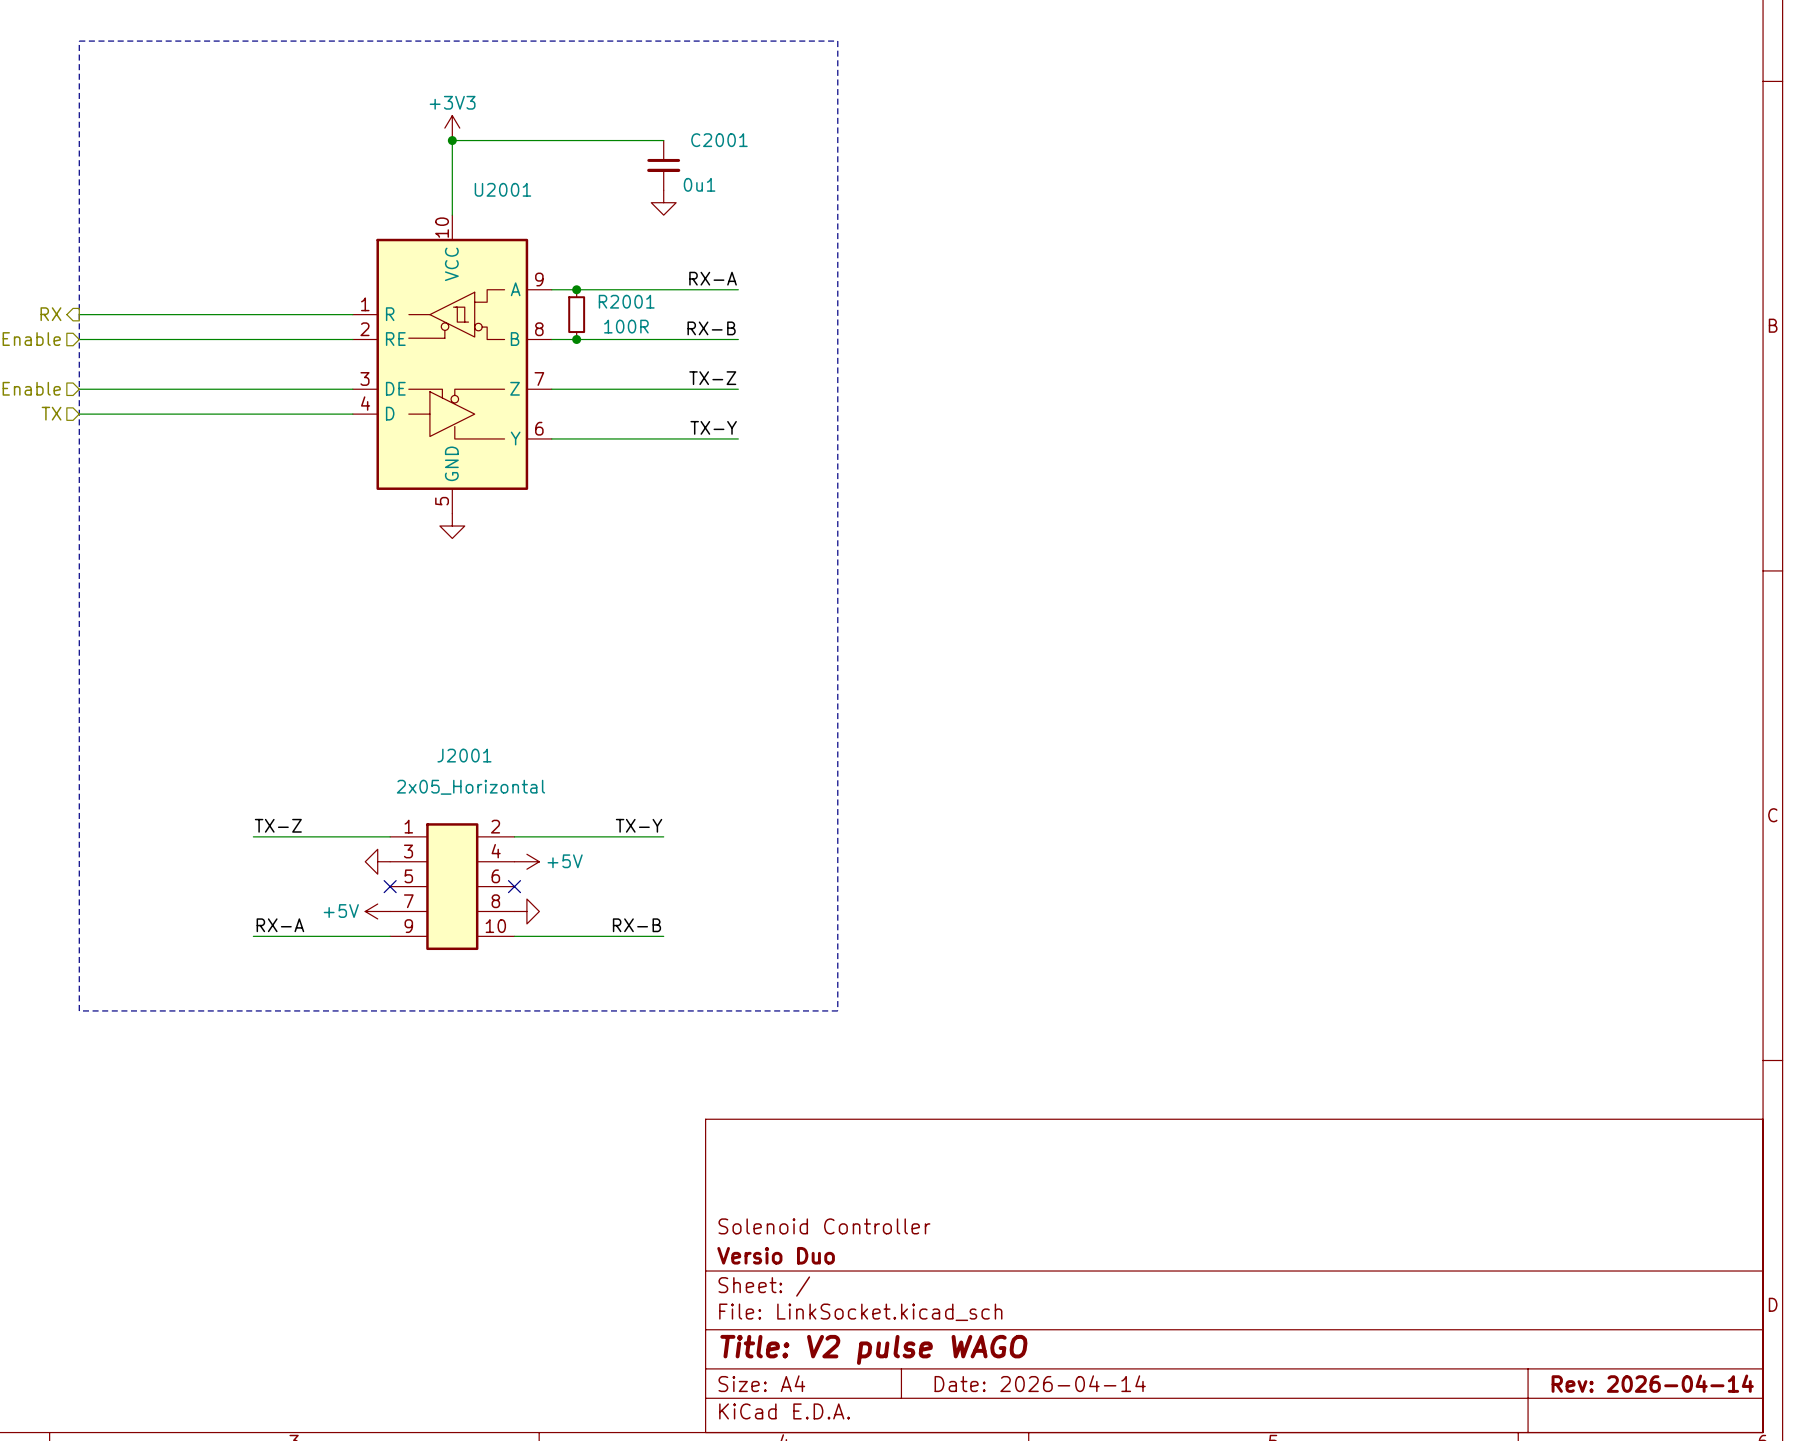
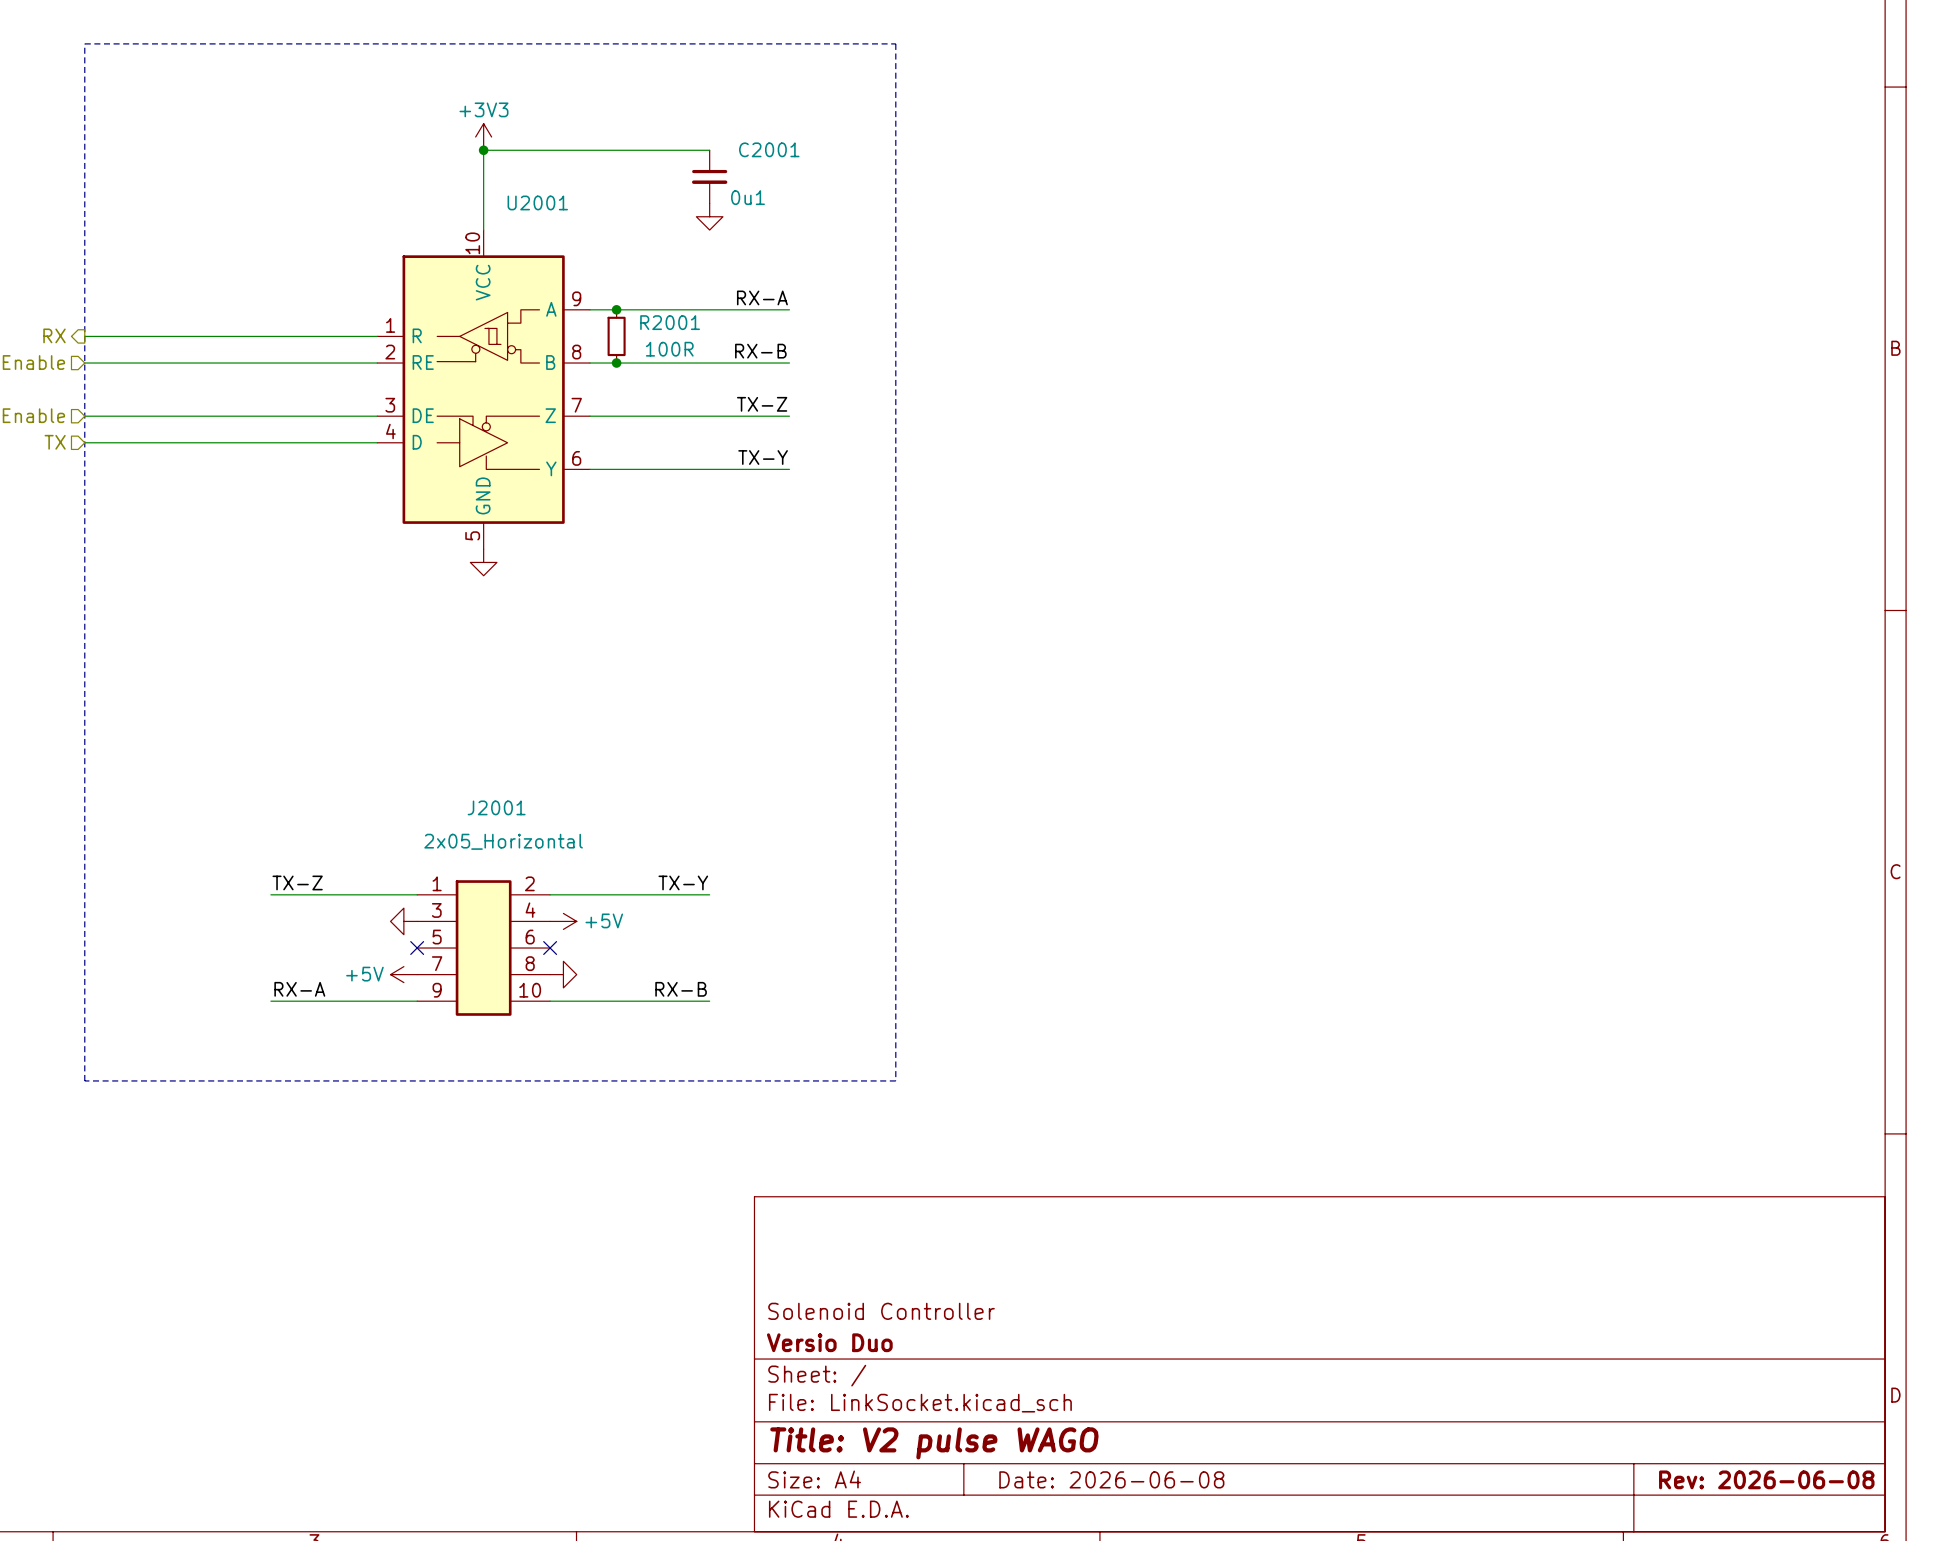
title block: Date: 2026-04-14 (1040, 1383) -> Date: 2026-06-08 (1111, 1479)
title block: Rev: 2026-04-14 (1652, 1383) -> Rev: 2026-06-08 (1766, 1479)

